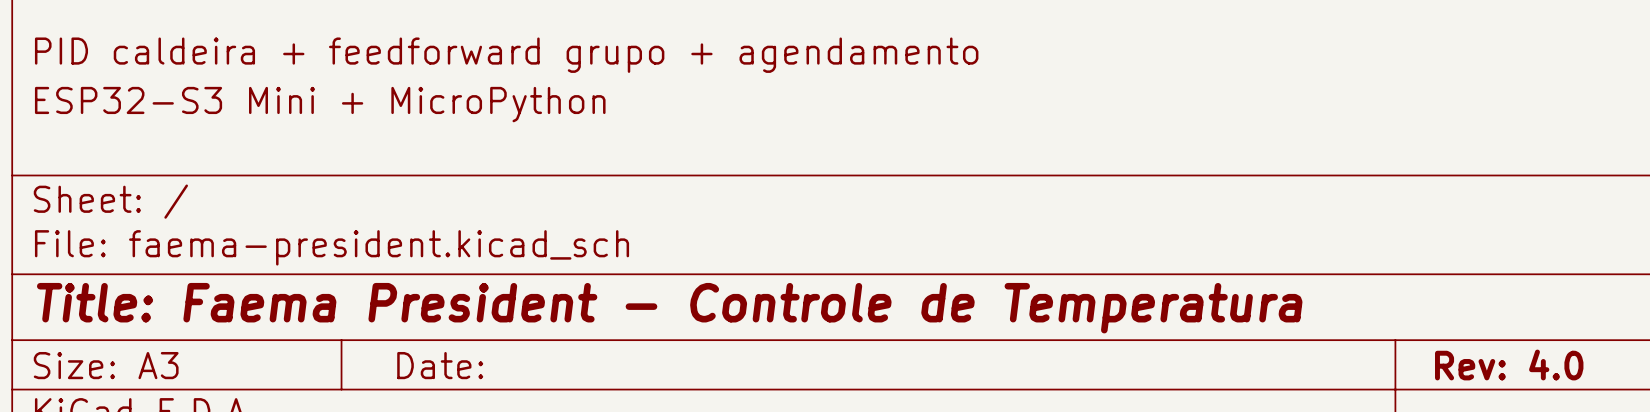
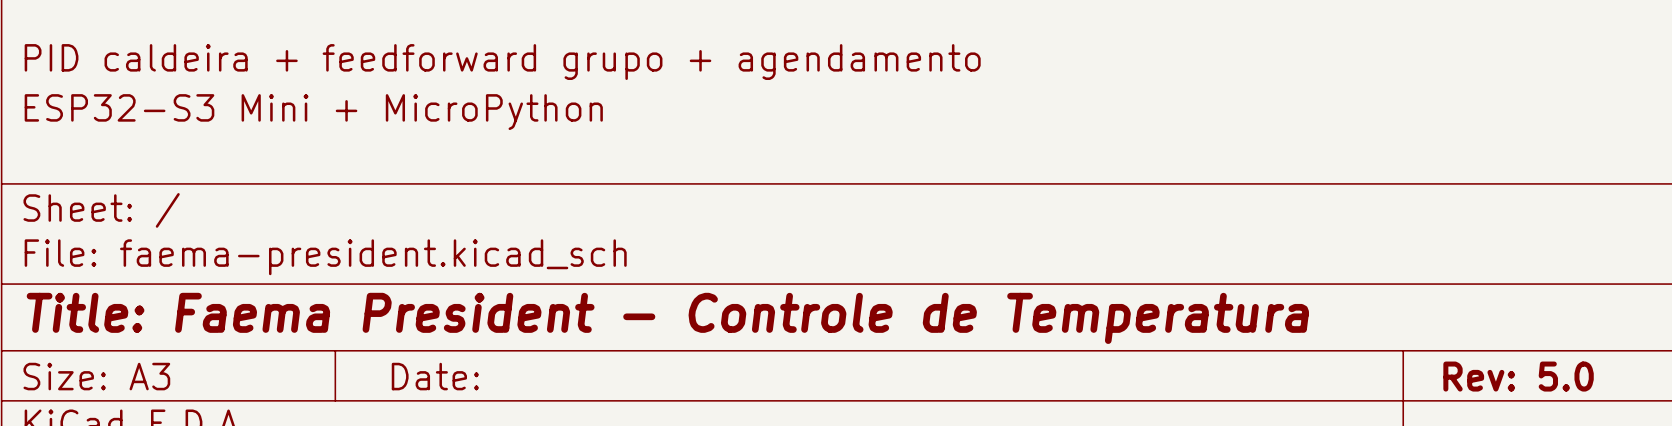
title block: Rev: 4.0 (1509, 364) -> Rev: 5.0 (1518, 376)

